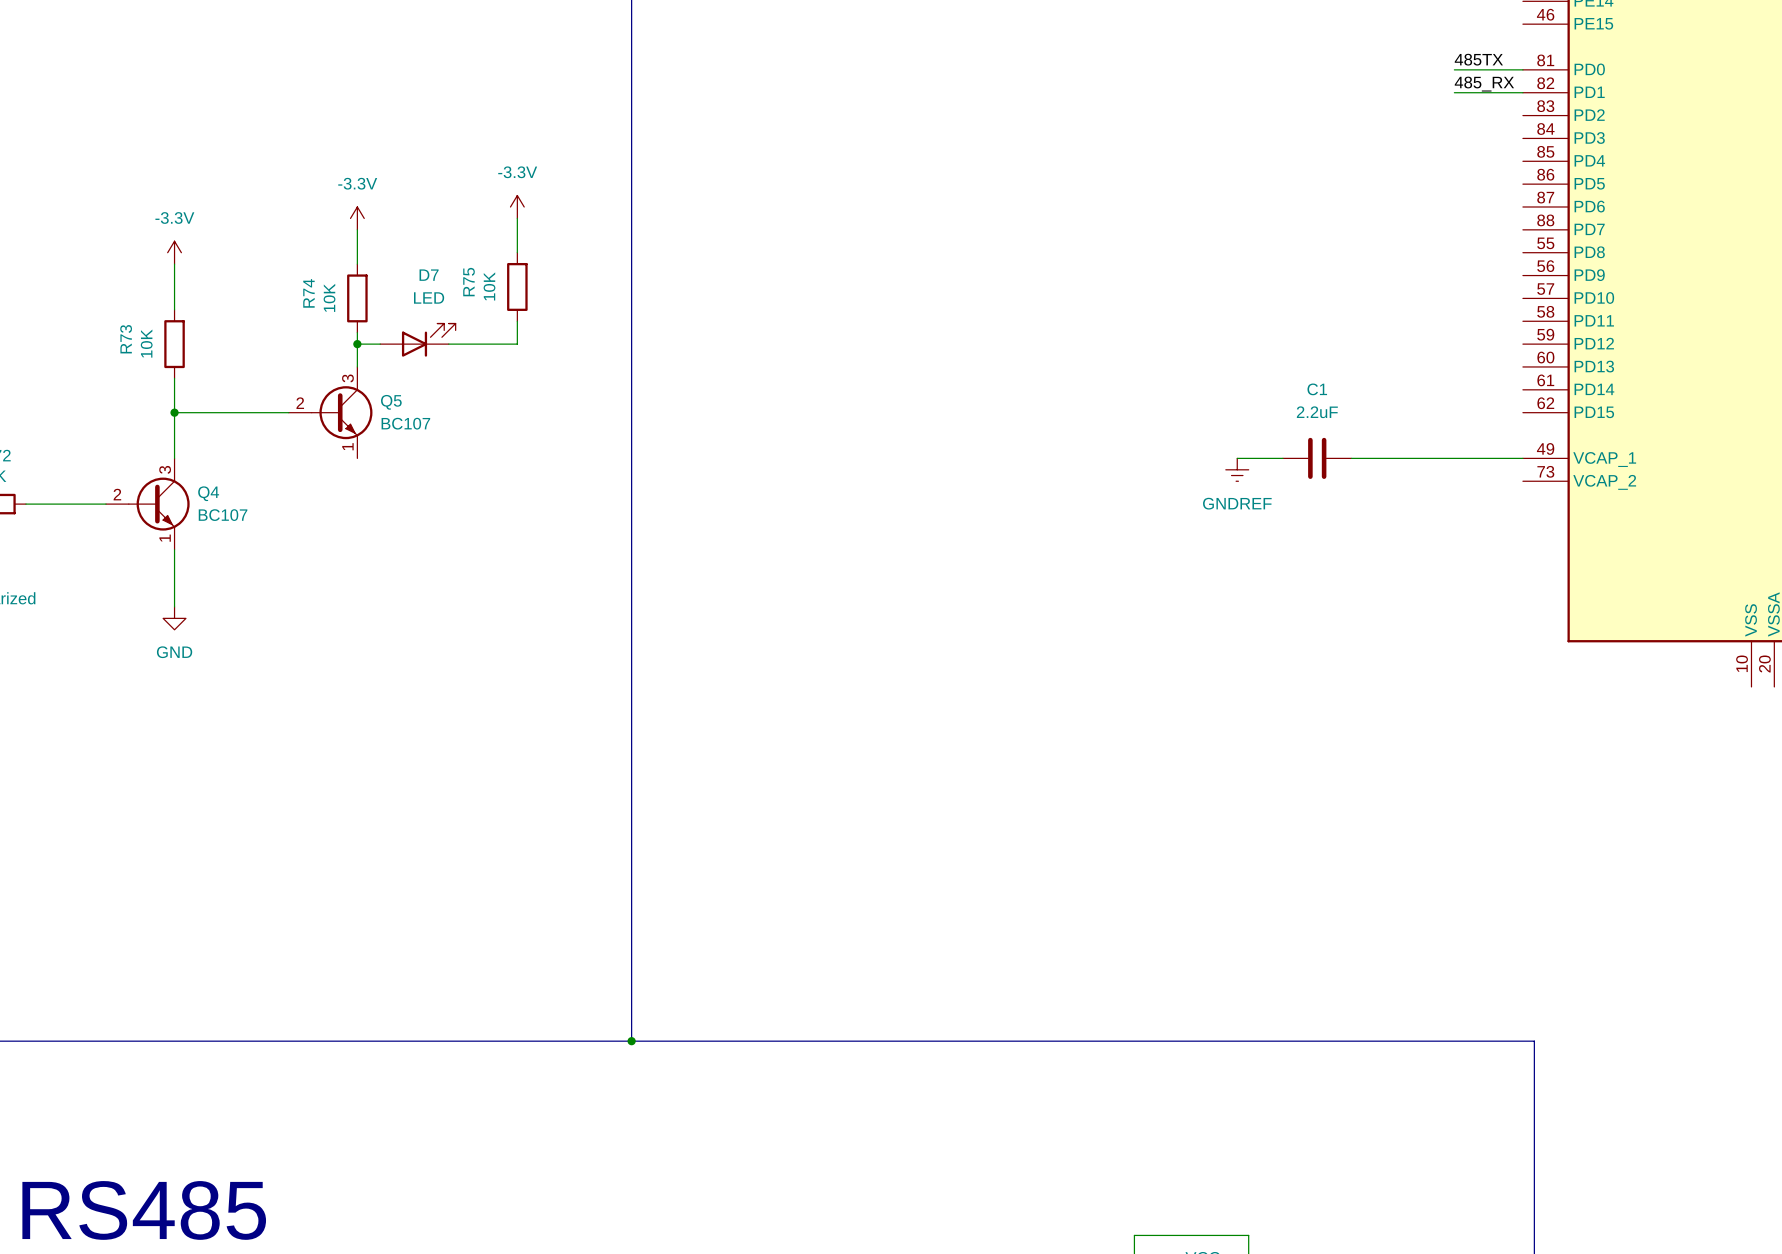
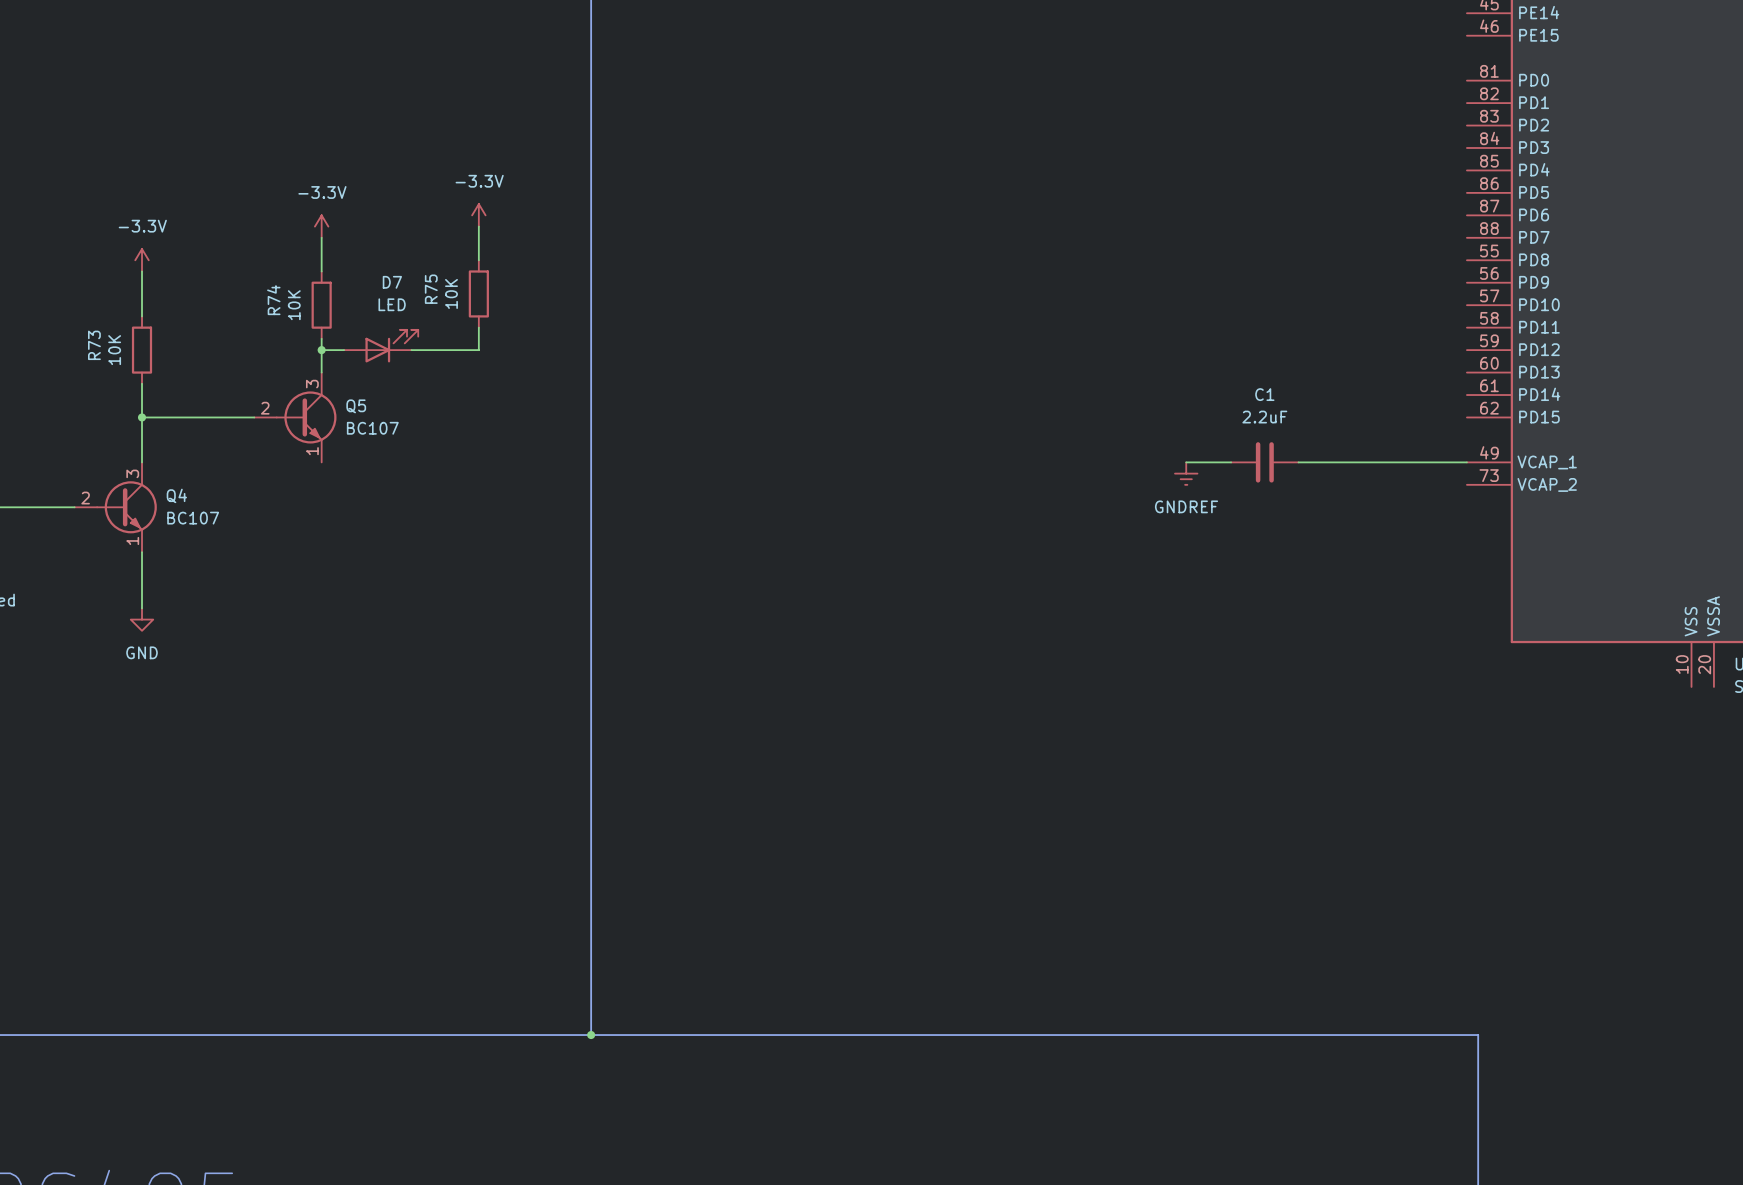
label: 485TX (1478, 59) -> none
wire: (1454, 69) (1522, 69) -> none
label: 485_RX (1484, 84) -> none
wire: (1454, 92) (1522, 92) -> none

